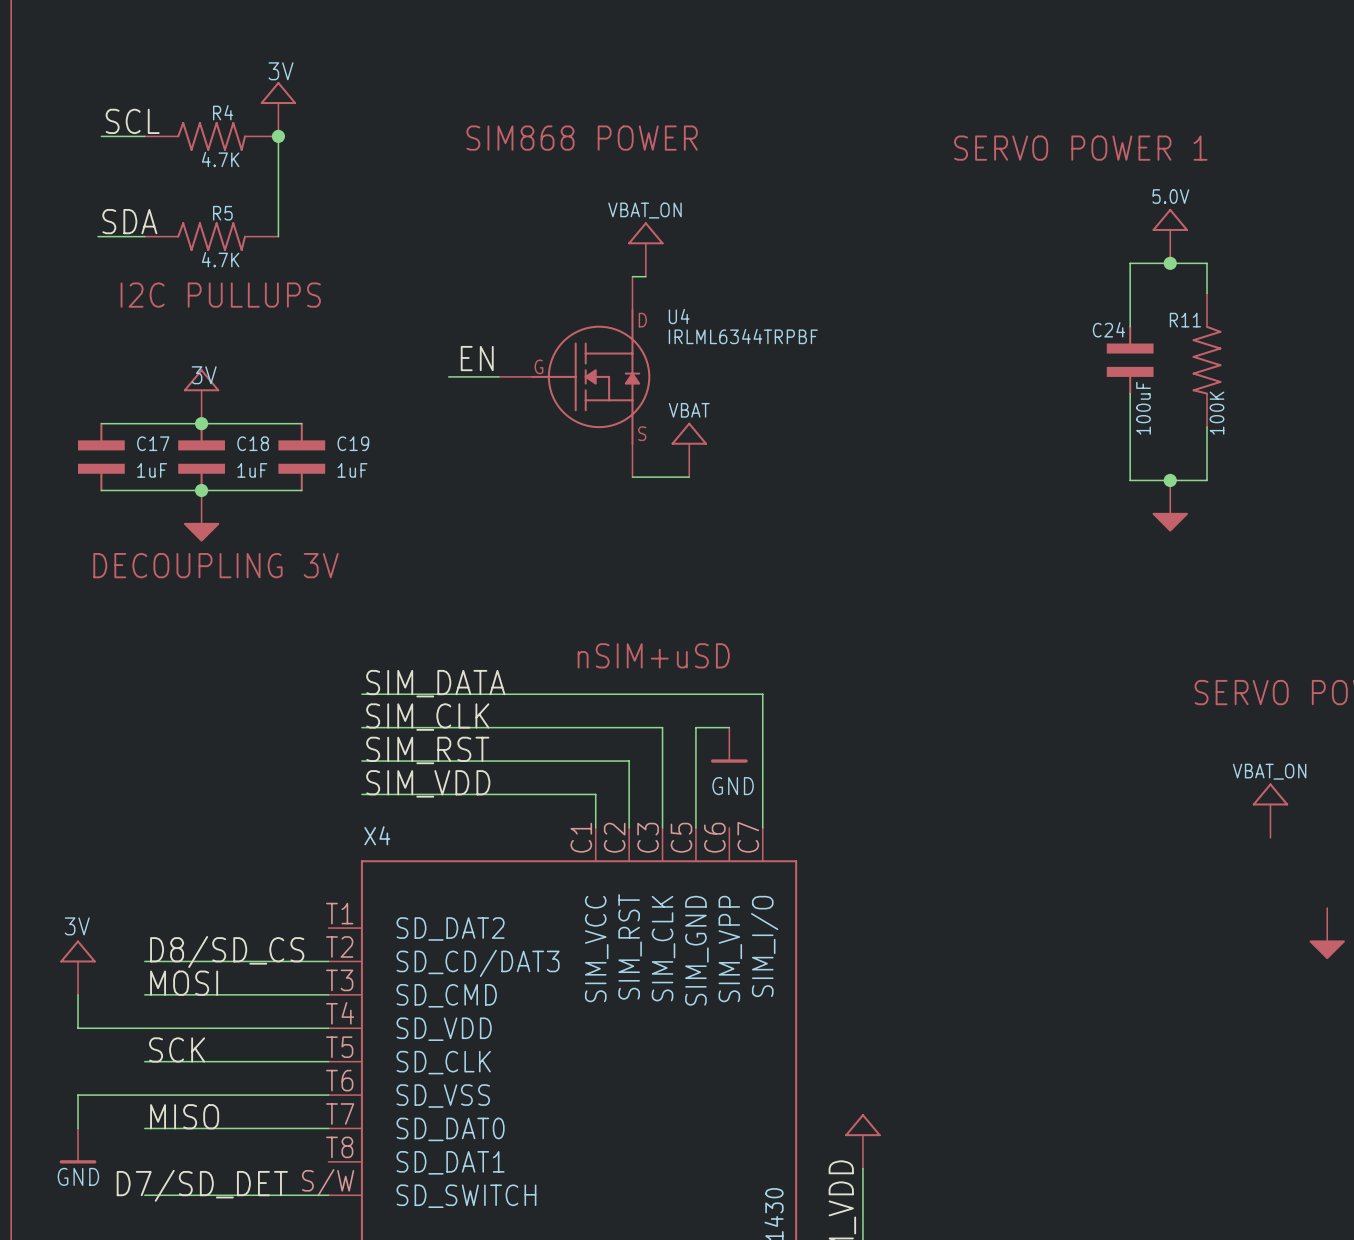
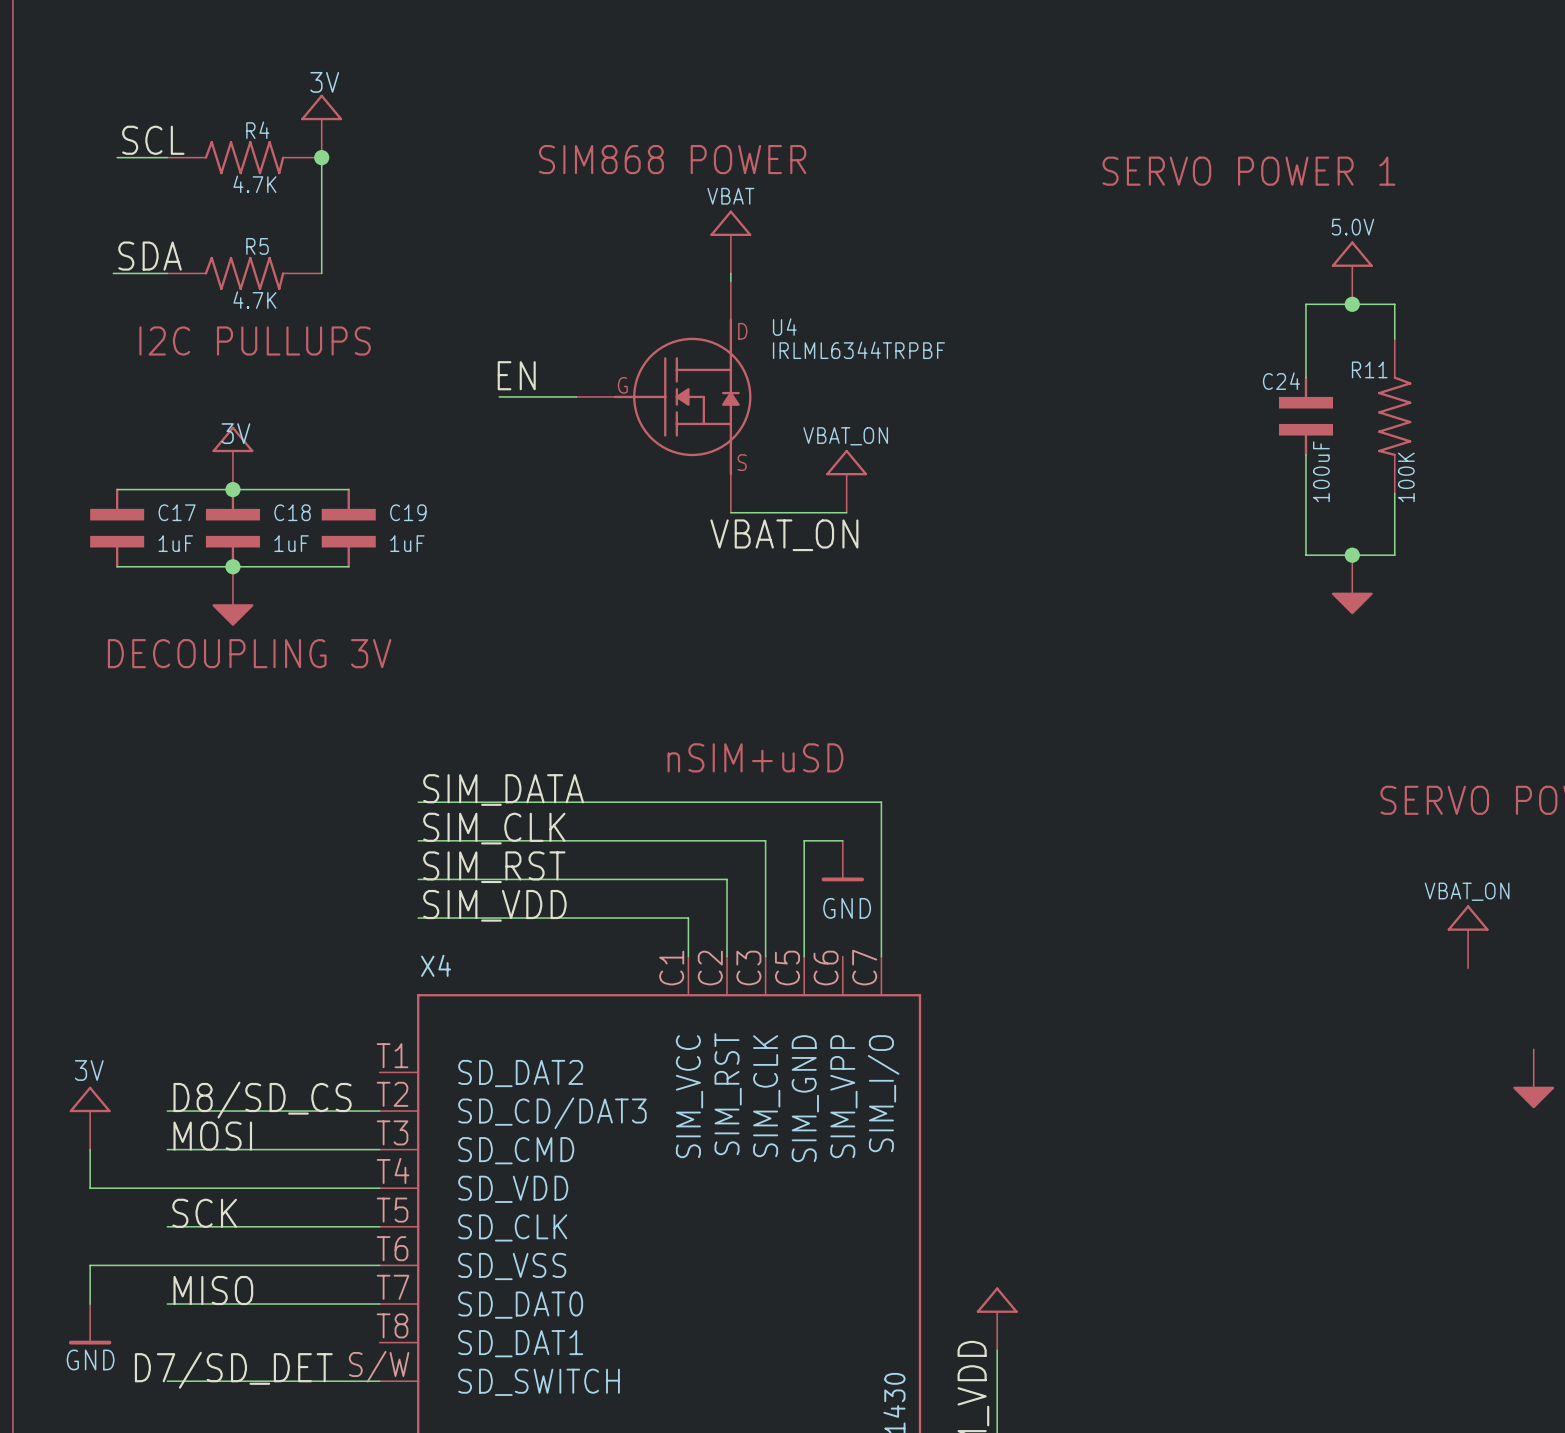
power symbol position: VBAT_ON (645, 249) -> VBAT_ON (846, 481)
wire: (632, 276) (645, 276) -> none
wire: none -> (499, 396) (576, 396)
label position: EN (477, 358) -> EN (516, 375)
wire: (448, 376) (498, 376) -> none
U4 position: (574, 376) -> (663, 396)
wire: none -> (730, 512) (846, 512)
power symbol position: VBAT (689, 449) -> VBAT (730, 241)
label: none -> VBAT_ON (784, 535)
wire: (632, 477) (689, 477) -> none

